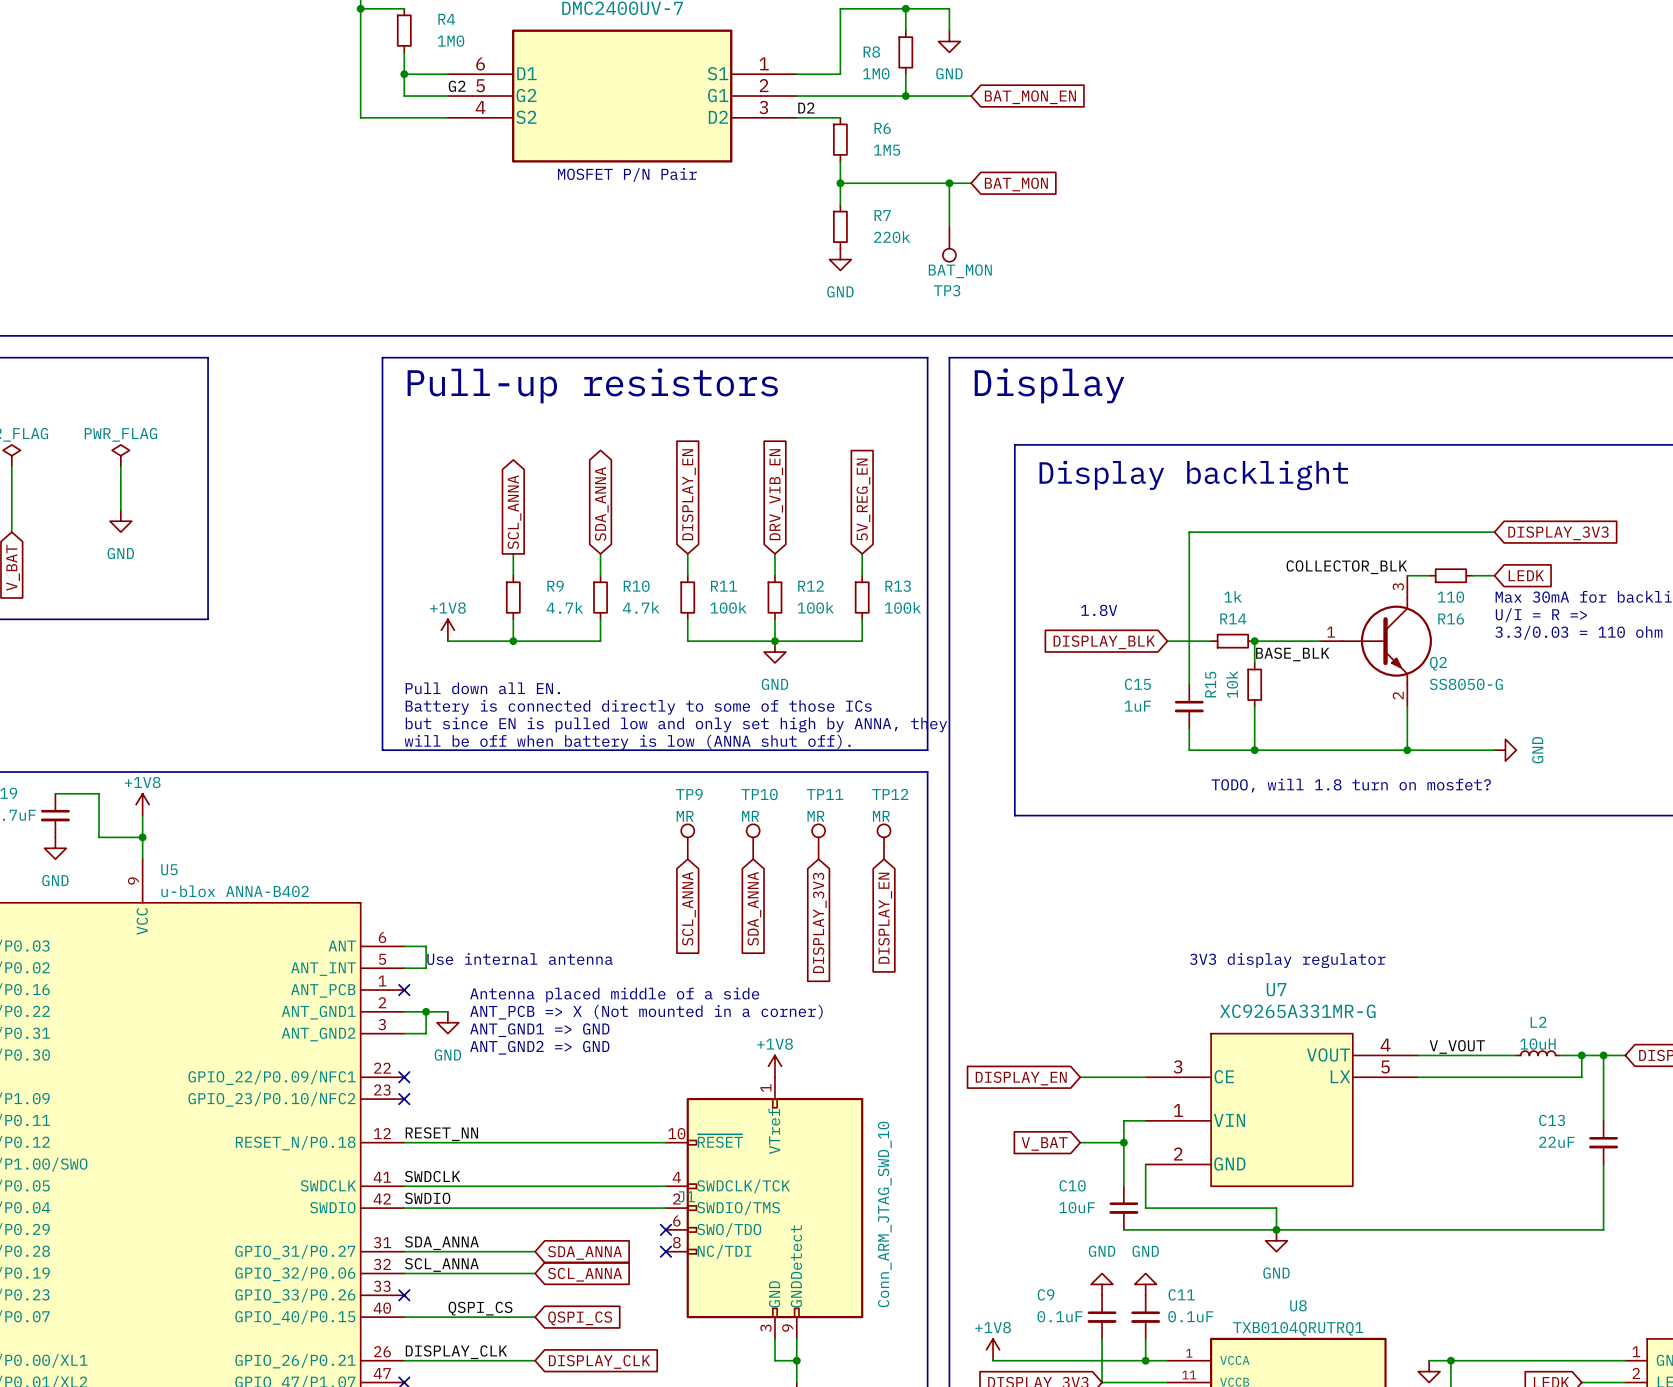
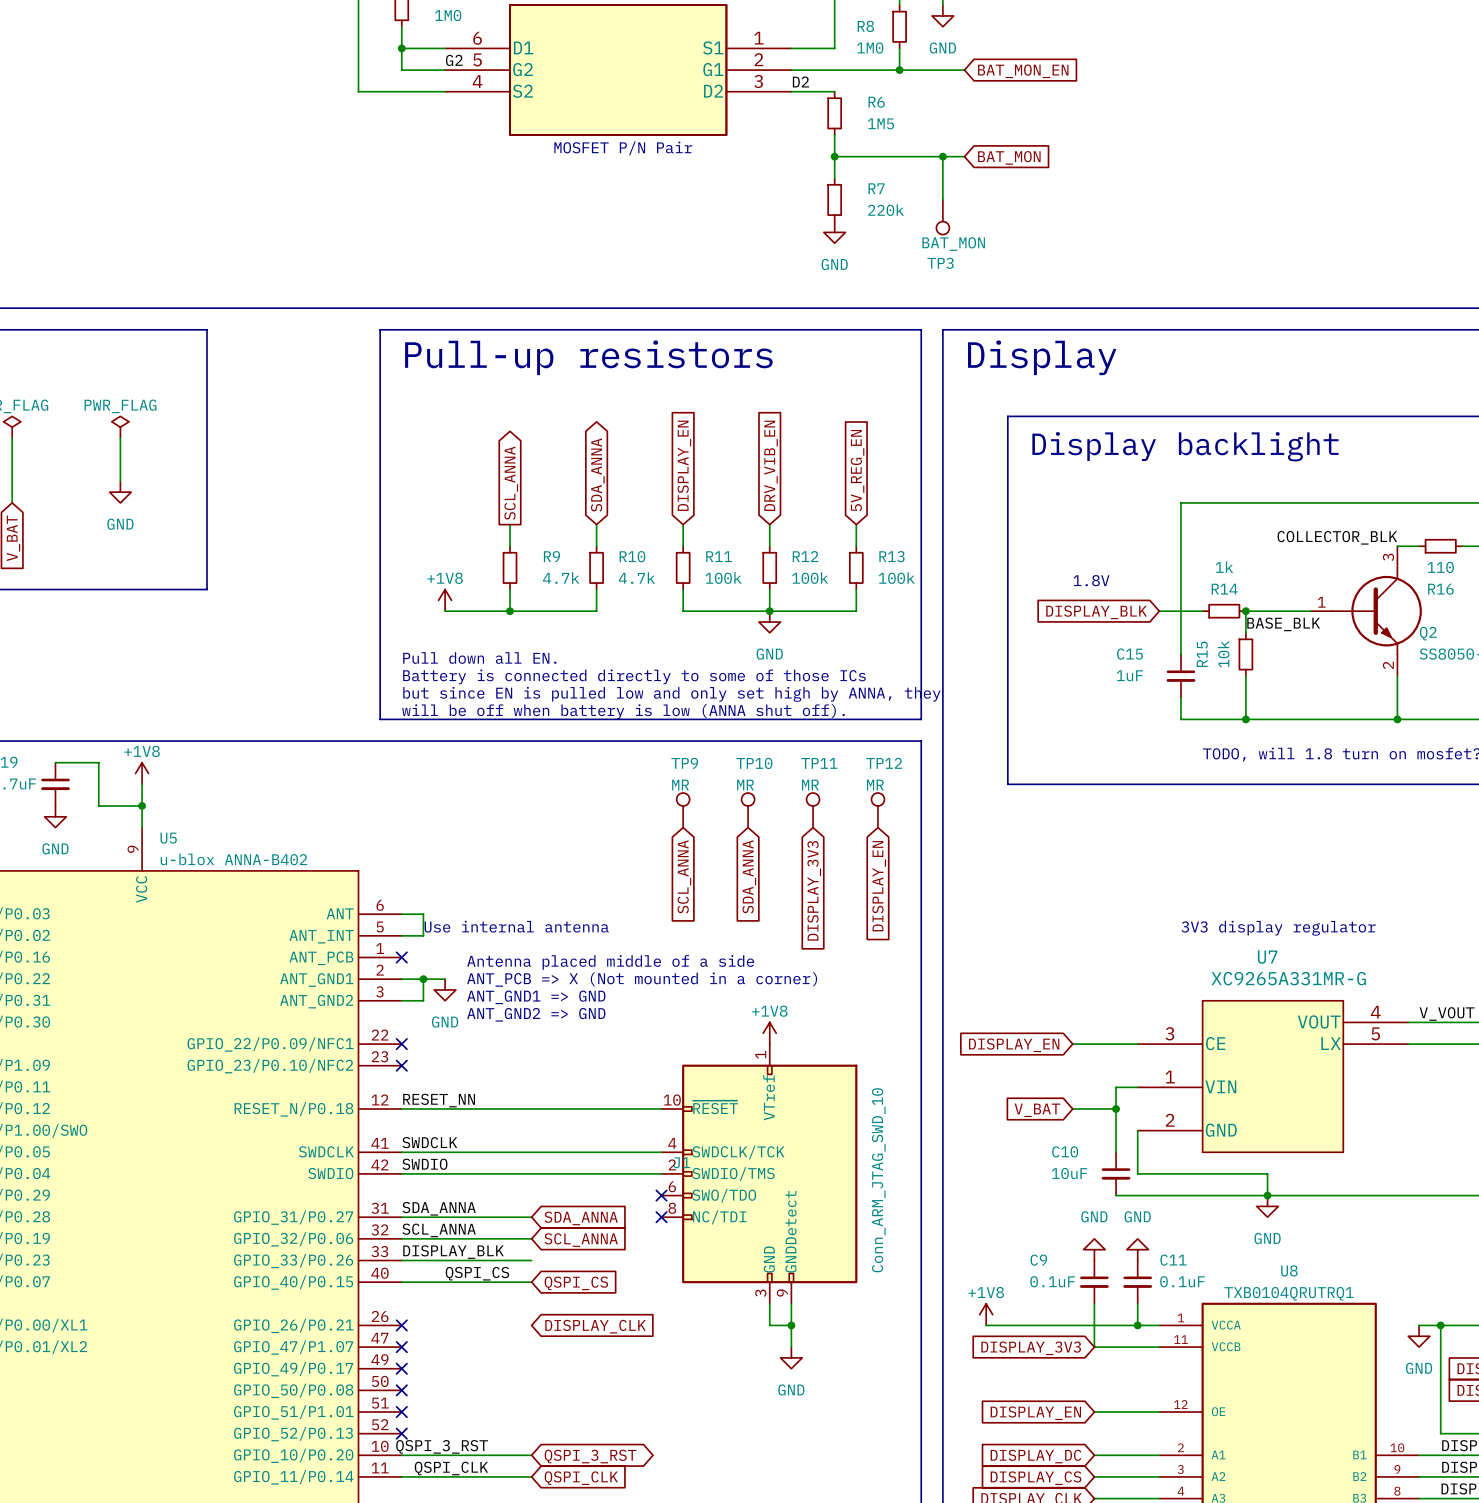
label: none -> DISPLAY_BLK (453, 1252)
no-connect mark: (404, 1295) -> none
label: DISPLAY_CLK (456, 1352) -> none
wire: (404, 1360) (535, 1360) -> (401, 1260) (531, 1260)
no-connect mark: none -> (401, 1325)

